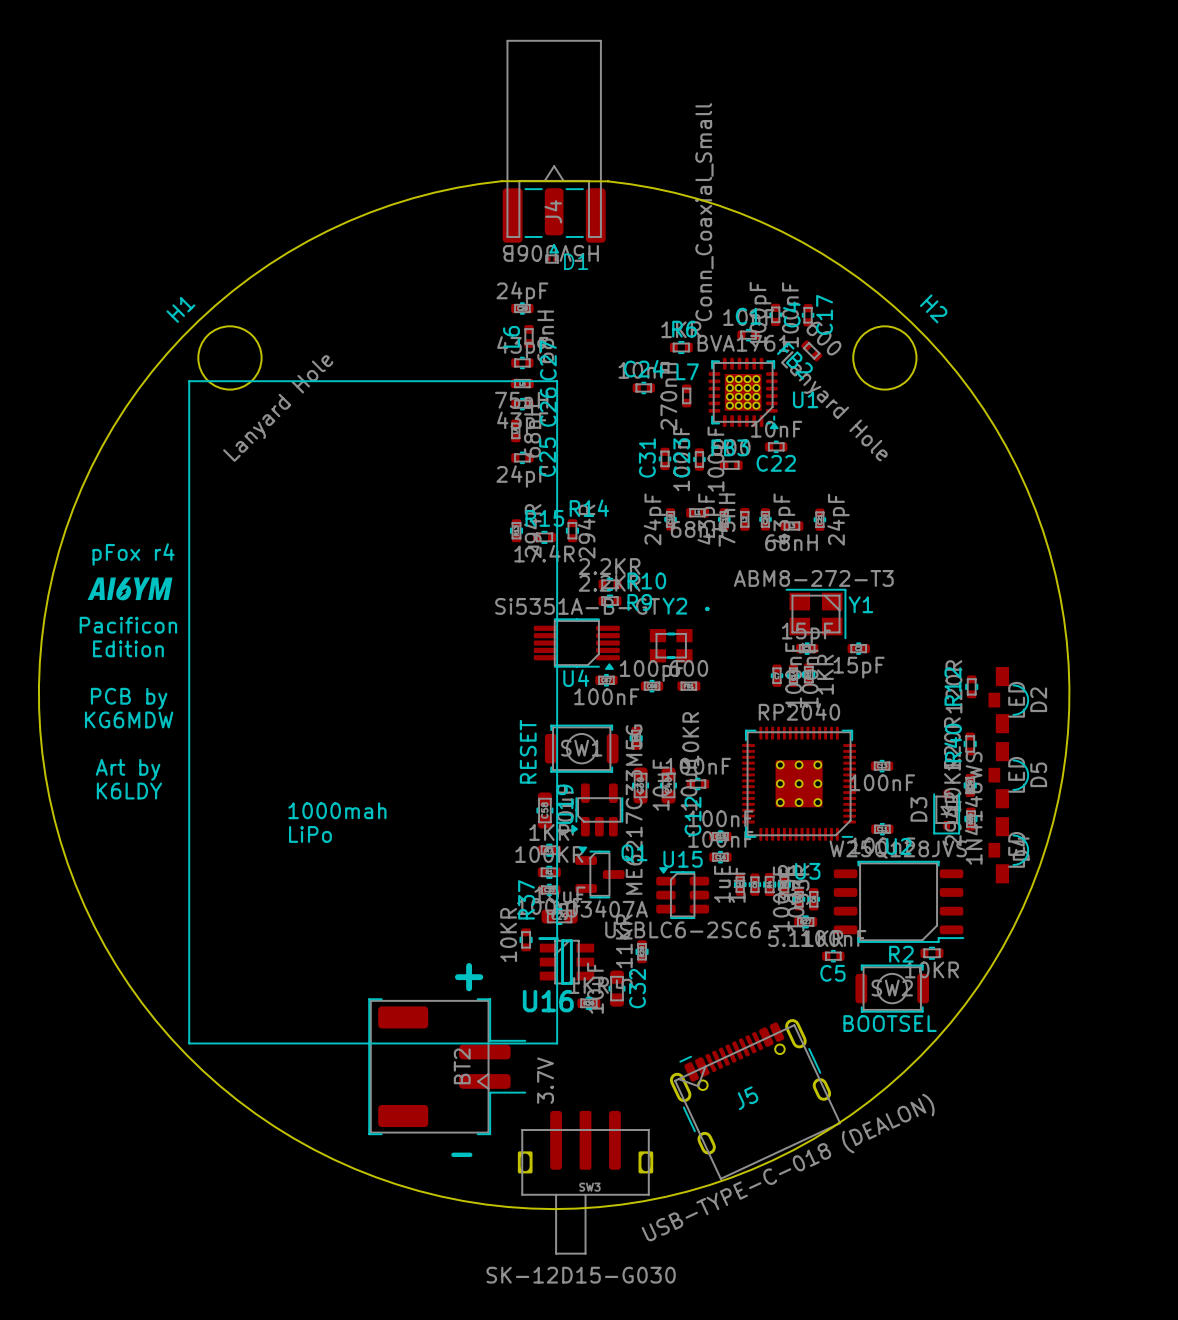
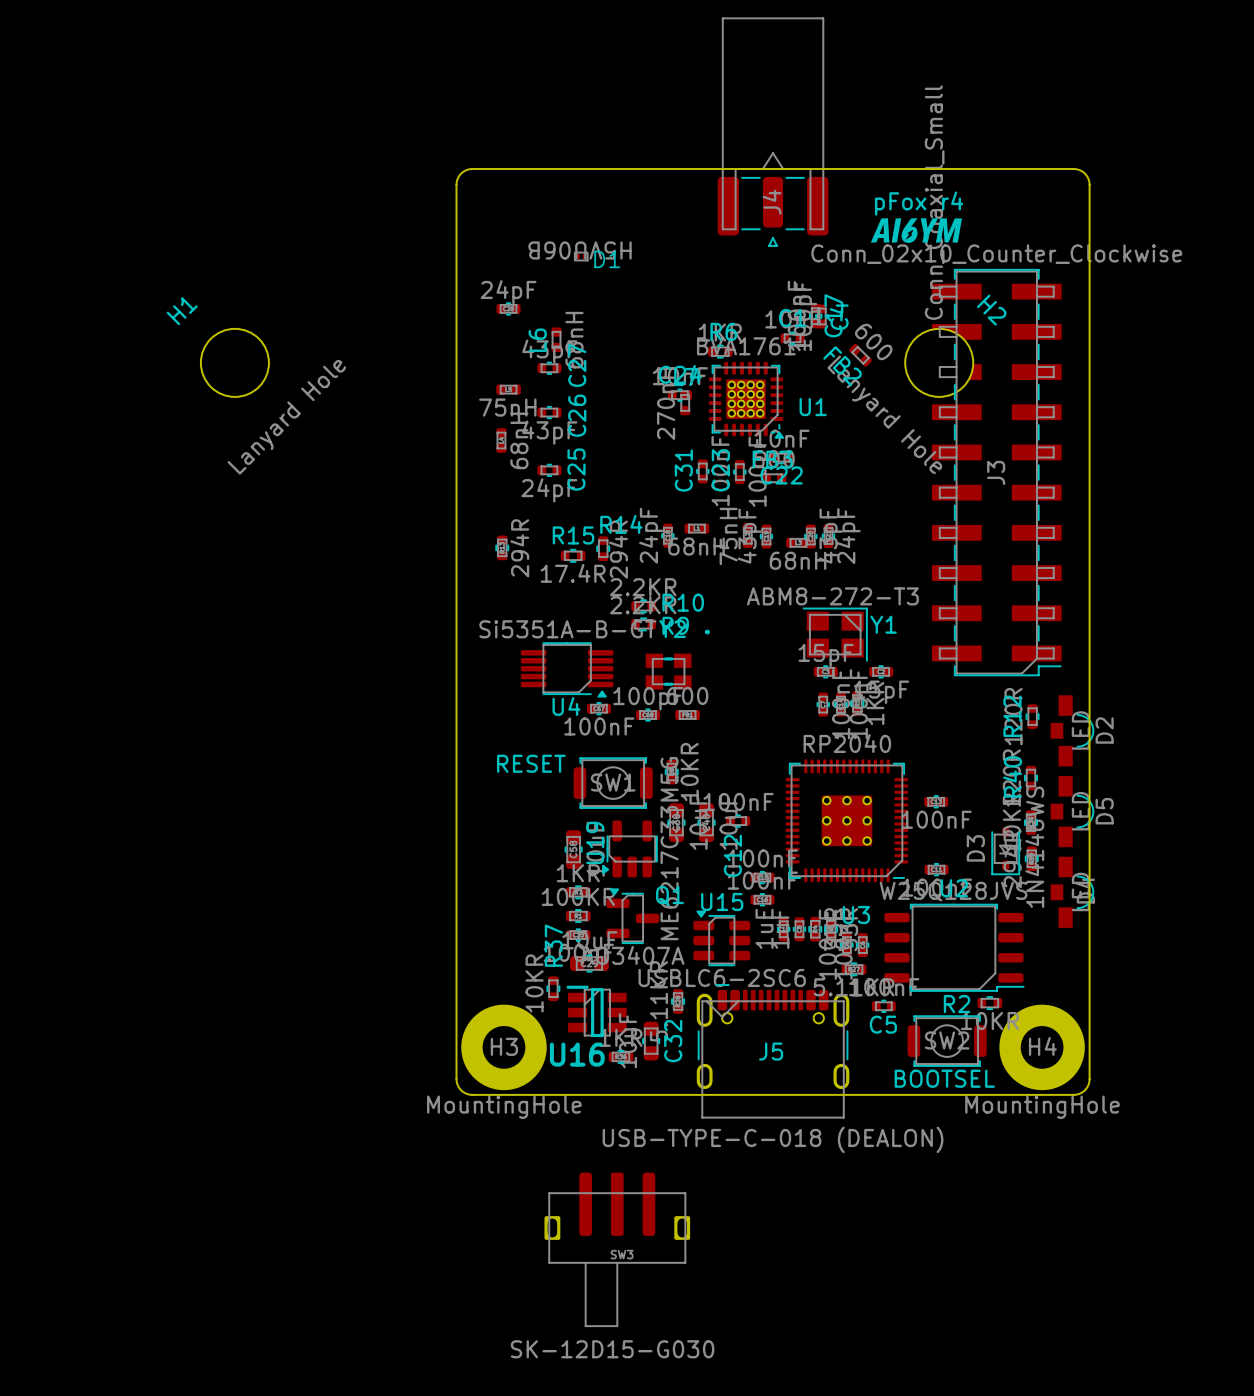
J4 position: (554, 146) -> (773, 132)
board edge: none -> (472, 169) (1073, 169) (1080, 170) (1087, 176) (1089, 184) (1089, 1079) (1088, 1085) (1082, 1092) (1073, 1094) (472, 1094) (463, 1092) (458, 1087) (456, 1079) (456, 184) (461, 173) (472, 169)
board edge: (501, 181) (608, 181) (652, 188) (697, 198) (740, 213) (781, 231) (821, 253) (877, 292) (911, 322) (942, 355) (970, 390) (1007, 447) (1026, 488) (1043, 531) (1060, 596) (1066, 641) (1069, 687) (1068, 732) (1062, 777) (1047, 843) (1032, 886) (1002, 947) (978, 986) (951, 1022) (904, 1071) (869, 1101) (832, 1127) (793, 1150) (752, 1169) (709, 1185) (643, 1201) (598, 1207) (553, 1209) (508, 1207) (440, 1196) (397, 1184) (354, 1168) (313, 1149) (255, 1113) (219, 1085) (186, 1054) (156, 1021) (116, 965) (94, 926) (75, 885) (60, 842) (49, 798) (42, 753) (39, 708) (41, 640) (48, 595) (59, 551) (82, 487) (102, 446) (125, 407) (152, 371) (182, 337) (215, 305) (269, 264) (308, 241) (369, 212) (412, 198) (457, 187) (501, 181) -> none
text: none -> pFox r4 (919, 203)
drawing: none -> [870, 218, 963, 243]
part position: (522, 308) -> (508, 308)
C17 position: (808, 315) -> (815, 316)
line: (189, 381) (557, 381) (557, 1043) (189, 1043) (189, 381) -> none
part position: (522, 383) -> (508, 389)
U1 position: (743, 393) -> (746, 400)
L7 position: (686, 395) -> (685, 402)
part position: (515, 430) -> (501, 440)
C22 position: (776, 446) -> (781, 457)
J3: none -> Conn_02x10_Counter_Clockwise (996, 472)
part position: (697, 512) -> (696, 528)
part position: (670, 519) -> (667, 535)
part position: (744, 519) -> (747, 535)
part position: (819, 519) -> (828, 536)
part position: (791, 526) -> (798, 542)
part position: (516, 530) -> (502, 547)
text: pFox r4 (133, 554) -> none
drawing: [87, 577, 173, 601] -> none
Y1 position: (816, 614) -> (835, 634)
text: Pacificon (128, 625) -> none
Y2 position: (679, 634) -> (677, 659)
U4 position: (576, 644) -> (567, 669)
text: Edition (128, 648) -> none
part position: (807, 648) -> (825, 671)
part position: (858, 648) -> (881, 671)
part position: (606, 680) -> (598, 708)
part position: (652, 686) -> (648, 715)
part position: (688, 686) -> (687, 715)
text: PCB by (129, 698) -> none
text: KG6MDW (129, 719) -> none
part value position: 10KR (690, 739) -> 10KR (689, 772)
text rotation: 0° (528, 751) -> 90° clockwise (531, 763)
text: Art by (128, 769) -> none
text: K6LDY (129, 791) -> none
text: 1000mah (337, 810) -> none
text: LiPo (310, 834) -> none
text: + (469, 977) -> none
H3: none -> MountingHole (503, 1047)
H4: none -> MountingHole (1042, 1047)
BT2: 3.7V (447, 1066) -> none
J5 rotation: 0° (755, 1099) -> 25° clockwise (773, 1051)
J5 position: (755, 1099) -> (773, 1051)
text: - (461, 1154) -> none

